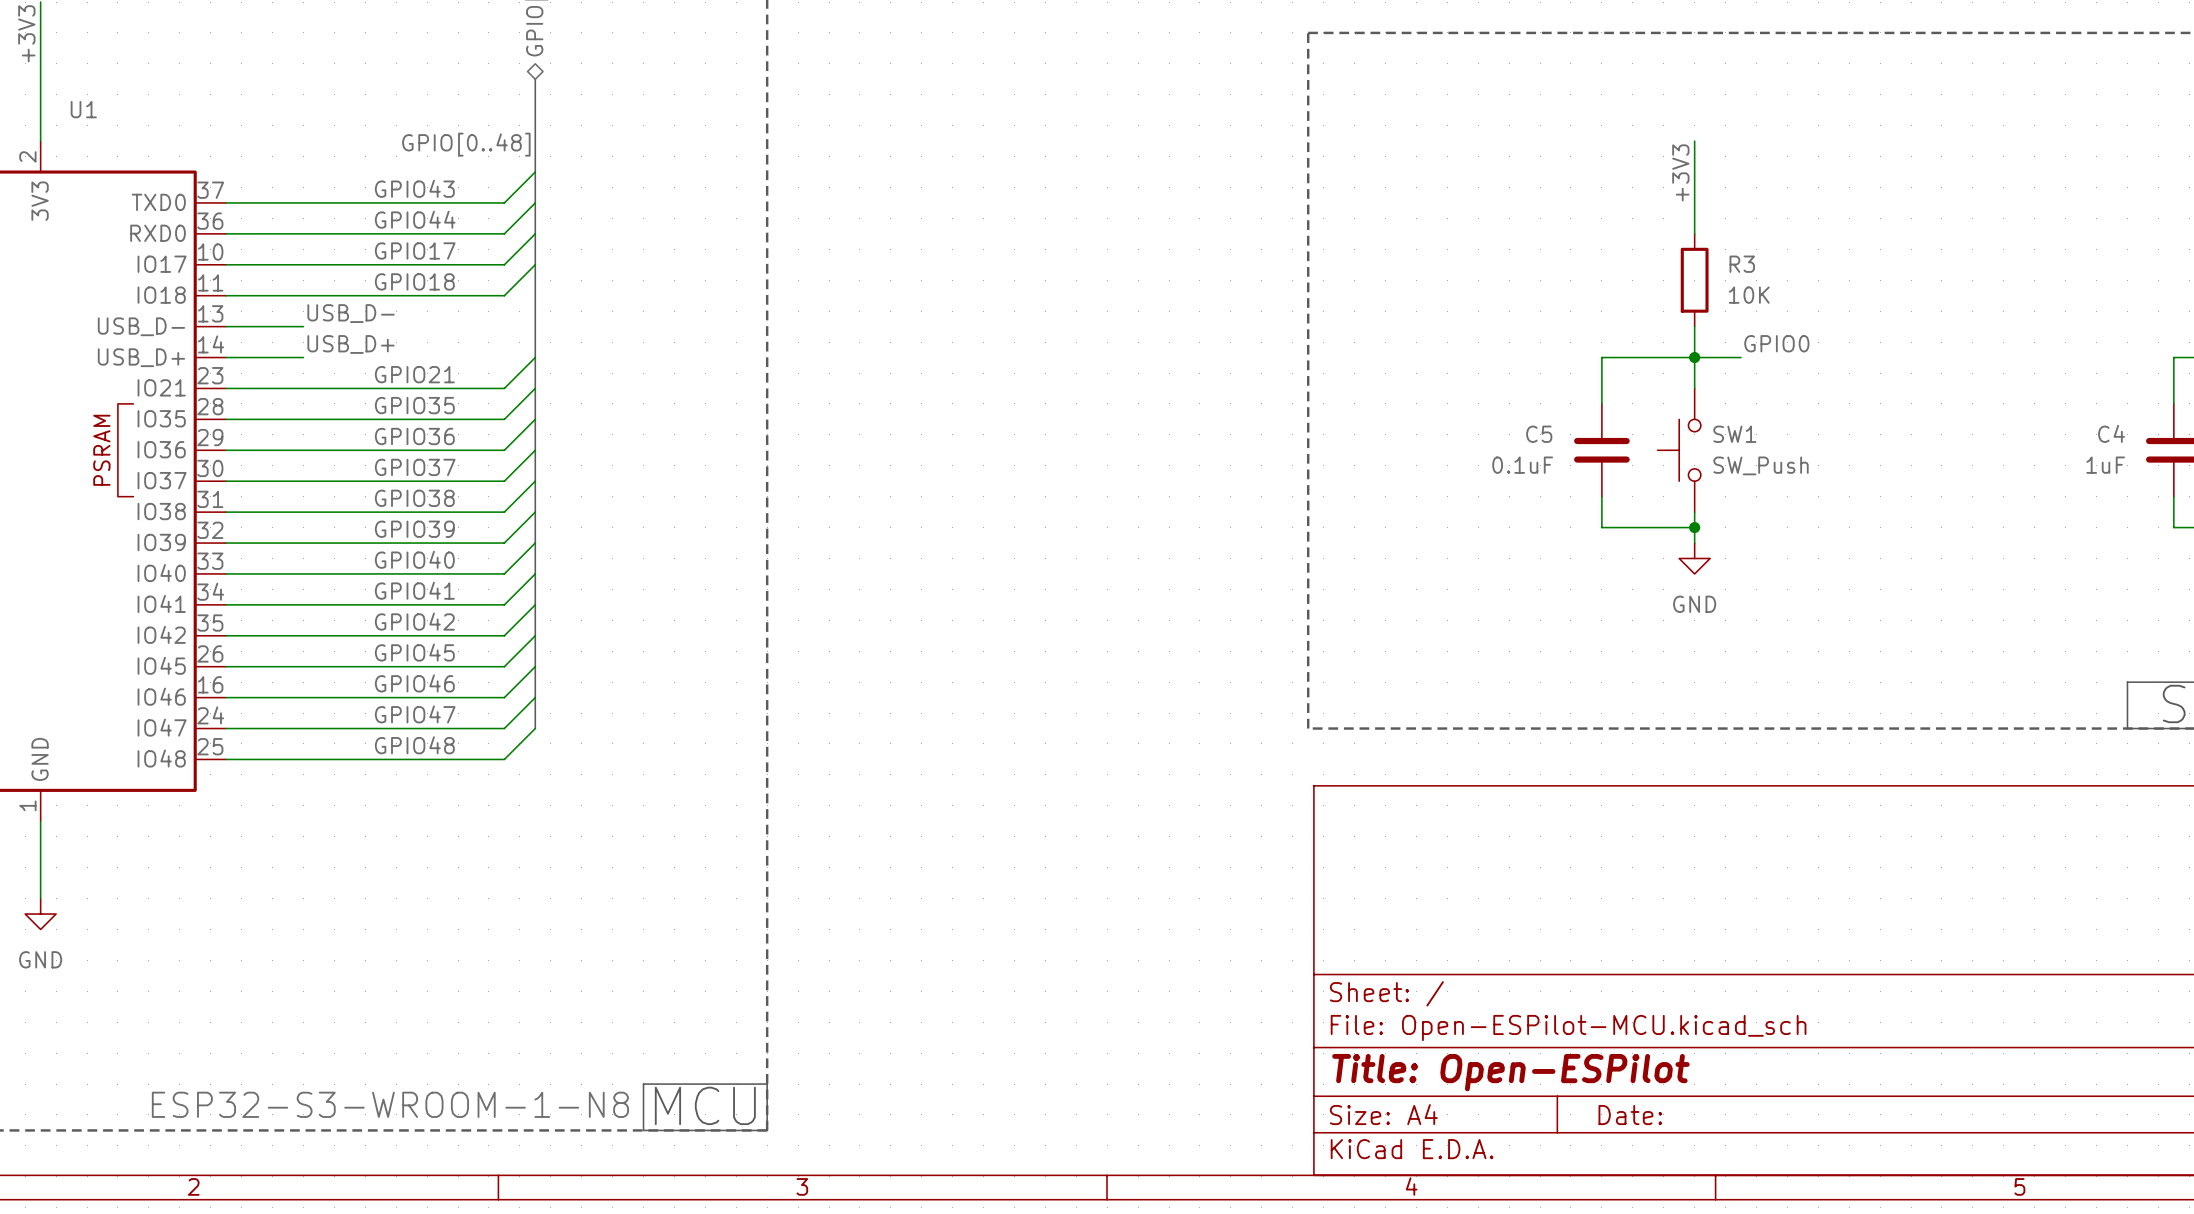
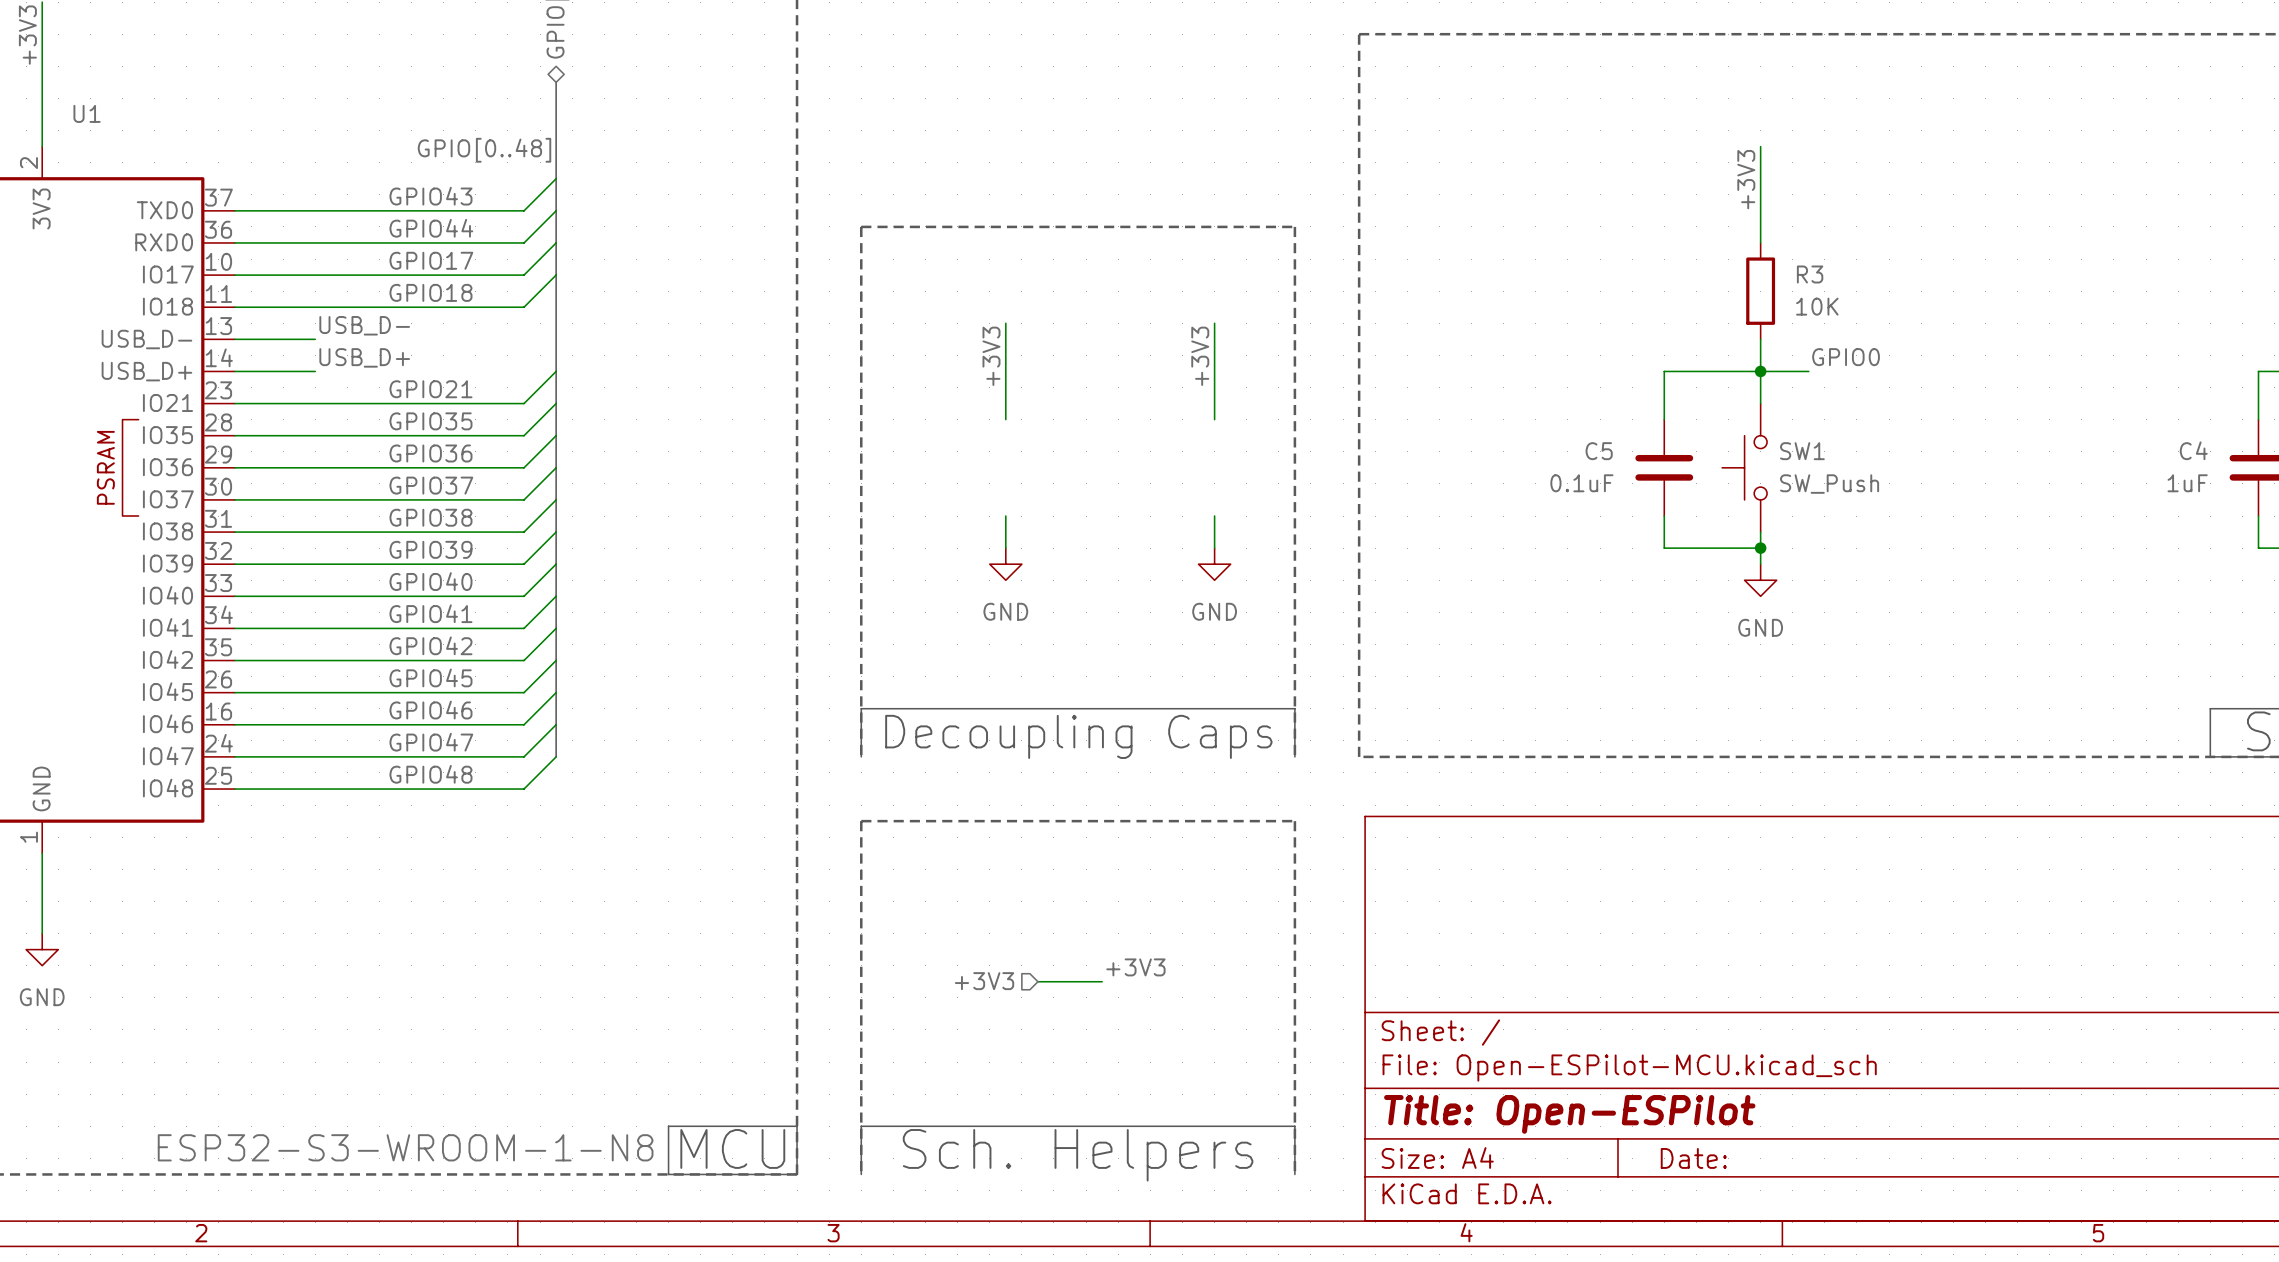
line: none -> (861, 226) (1294, 226) (1294, 756) (1294, 708) (861, 708) (861, 756) (861, 226)
wire: none -> (1005, 323) (1005, 419)
wire: none -> (1214, 323) (1214, 419)
label: none -> +3V3 (991, 356)
label: none -> +3V3 (1200, 356)
wire: none -> (1005, 516) (1005, 548)
wire: none -> (1214, 516) (1214, 548)
power symbol: none -> GND (1005, 564)
power symbol: none -> GND (1214, 564)
text: none -> Decoupling Caps (1078, 736)
line: none -> (861, 821) (1294, 821) (1294, 1174) (1294, 1126) (861, 1126) (861, 1174) (861, 821)
label: none -> +3V3 (1135, 967)
hierarchical label: none -> +3V3 (984, 981)
wire: none -> (1037, 981) (1102, 981)
text: none -> Sch. Helpers (1078, 1155)

